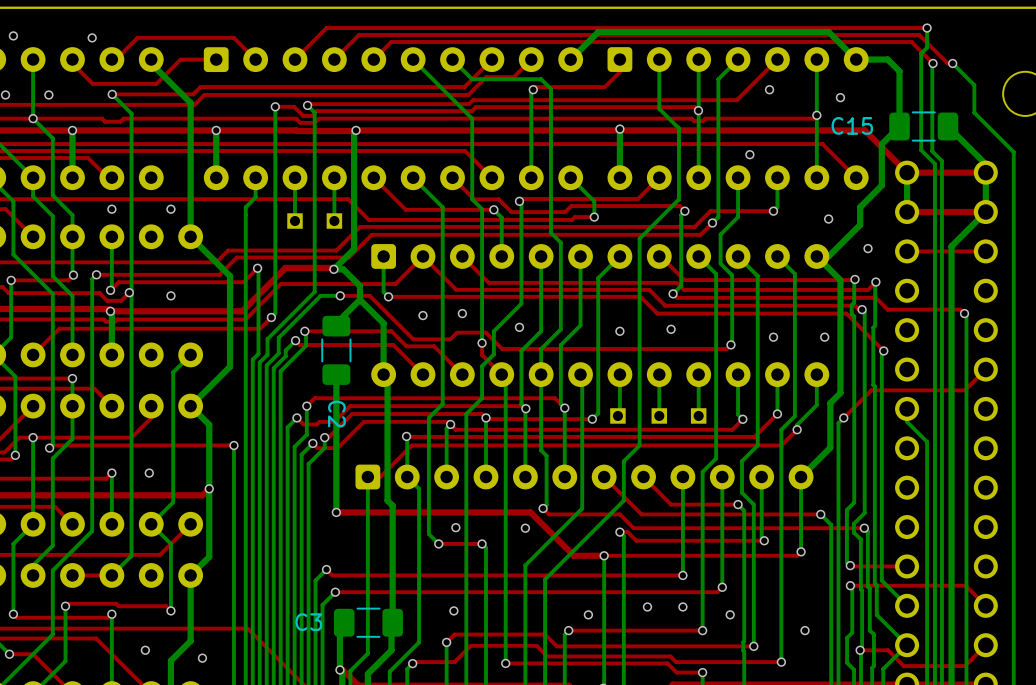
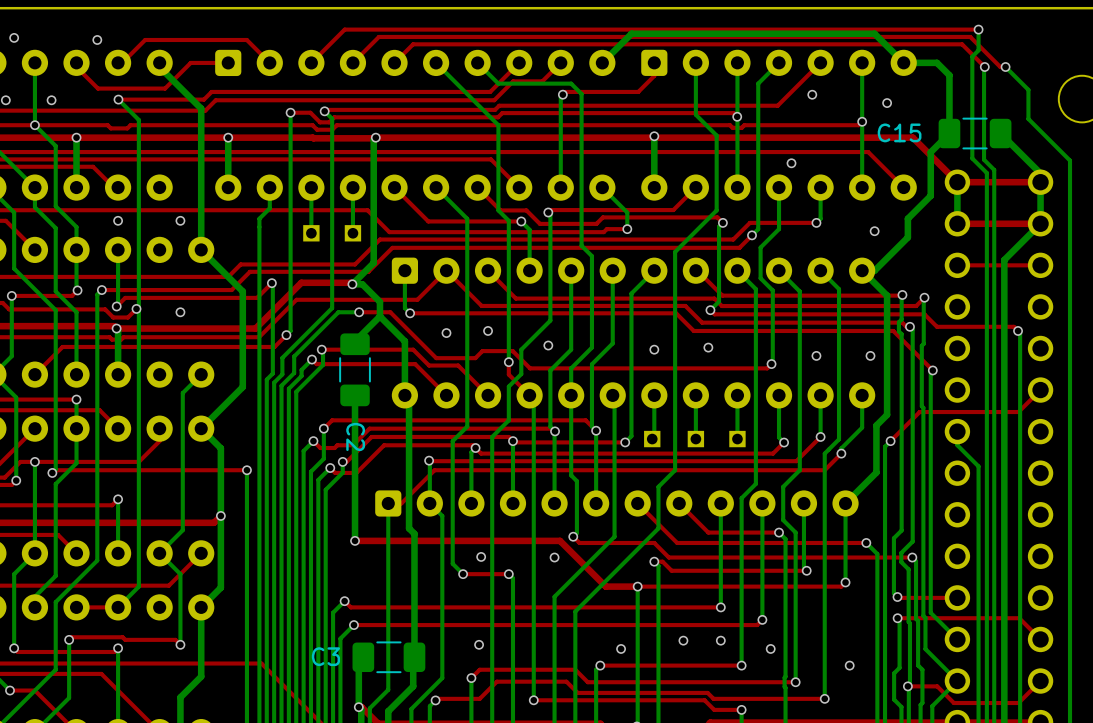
via: (868, 248) -> none
via: (149, 473) -> none
via: (145, 650) -> none
via: (202, 658) -> none

